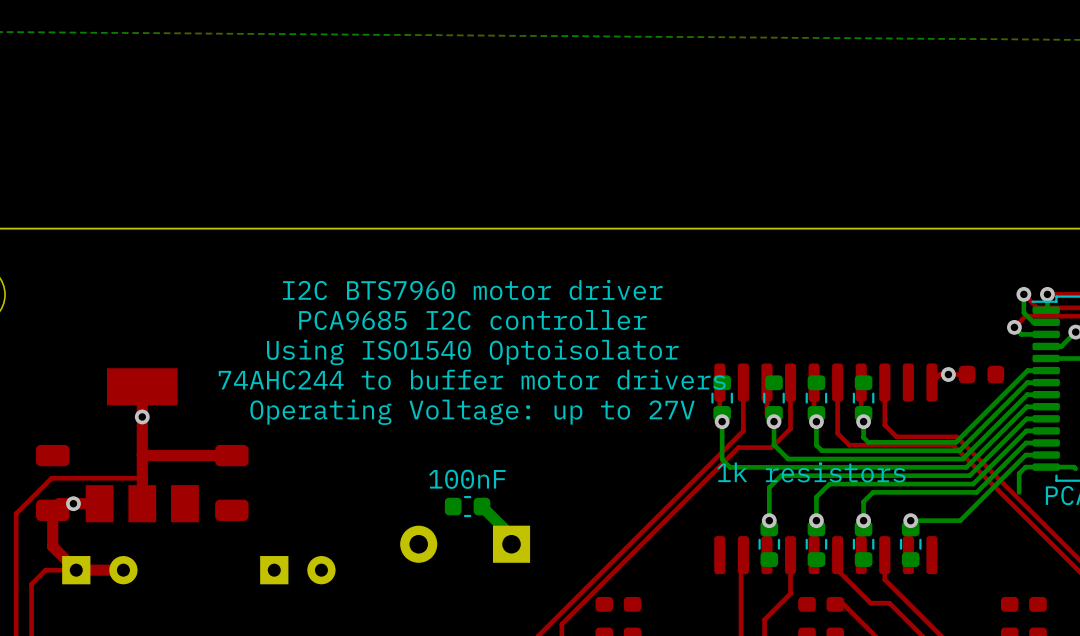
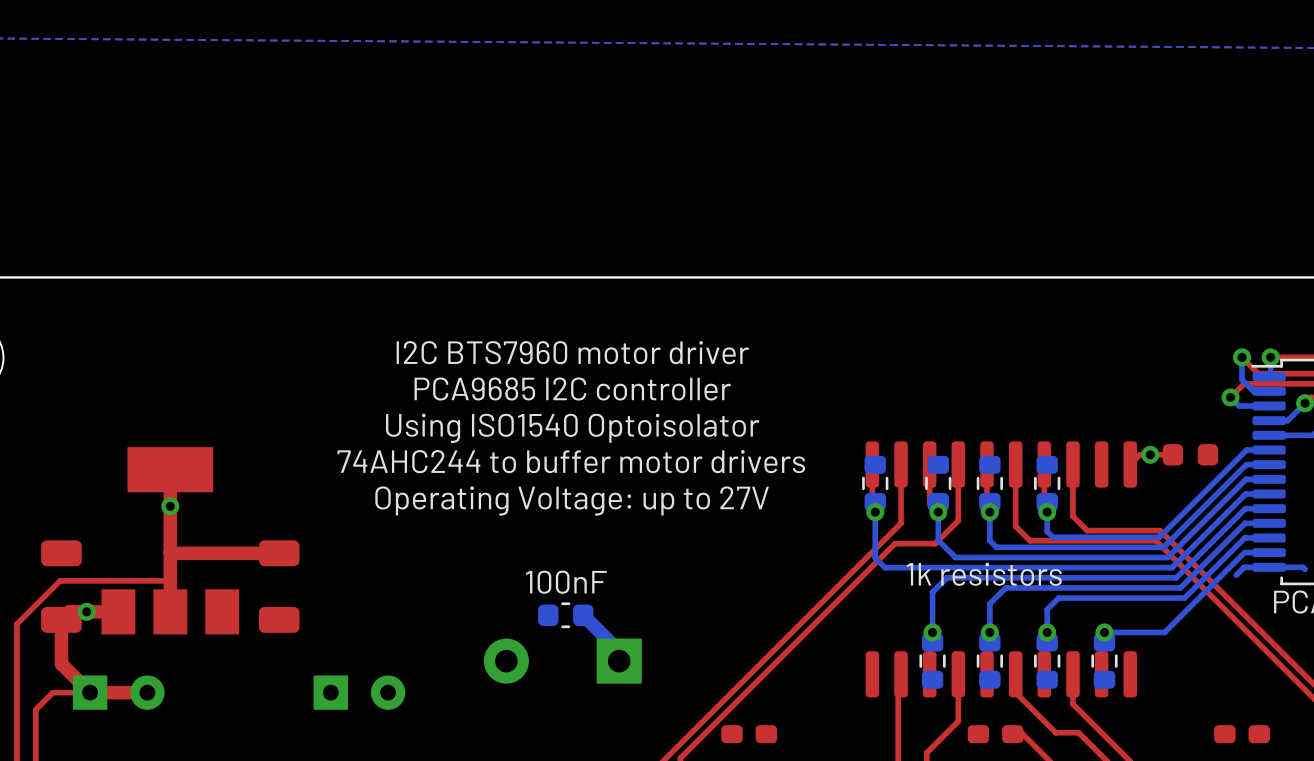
bottom track: (1019, 473) (1019, 492) -> none

